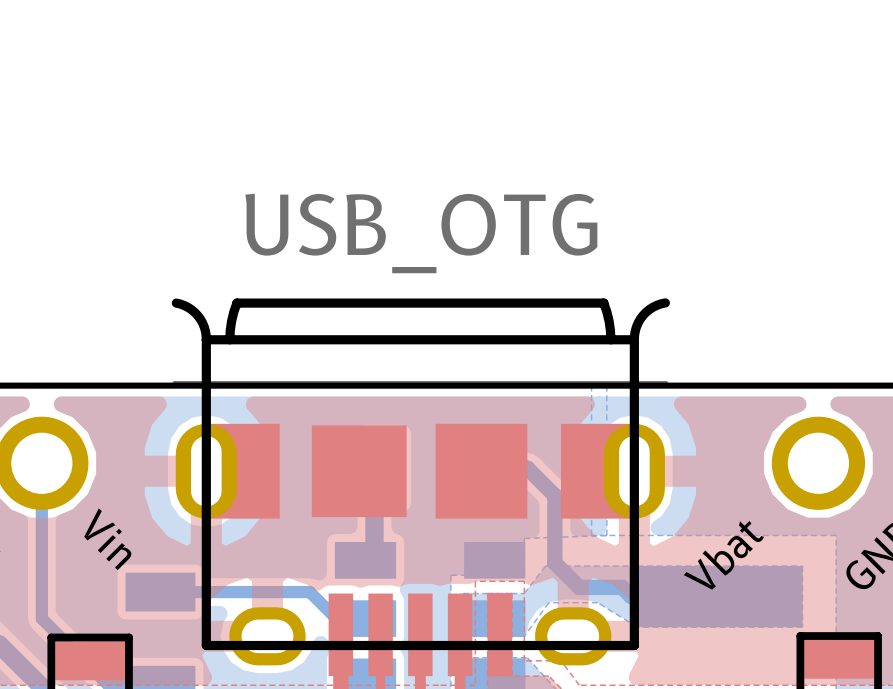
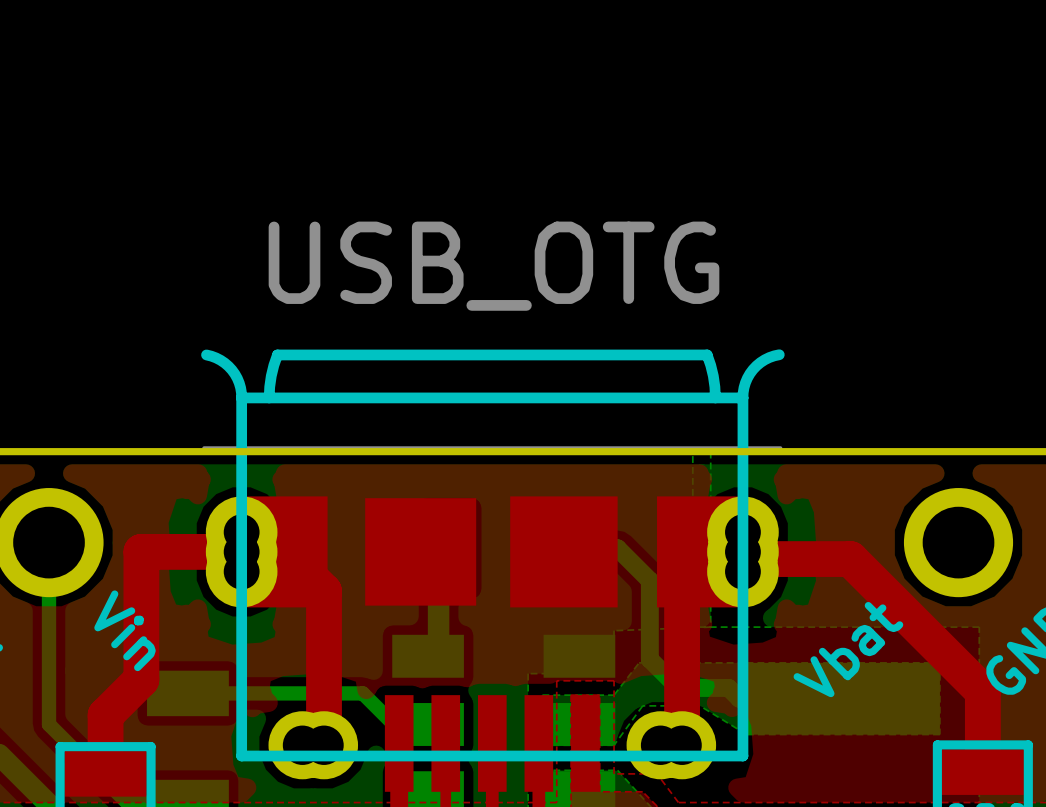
part footprint: [171, 298, 670, 677] -> [201, 349, 785, 792]
top track: none -> (241, 551) (141, 551) (141, 679) (105, 715) (105, 773)
top track: none -> (284, 551) (324, 591) (324, 745)
top track: none -> (699, 551) (682, 569) (682, 745)
top track: none -> (742, 551) (750, 559) (850, 559) (982, 691) (982, 772)

